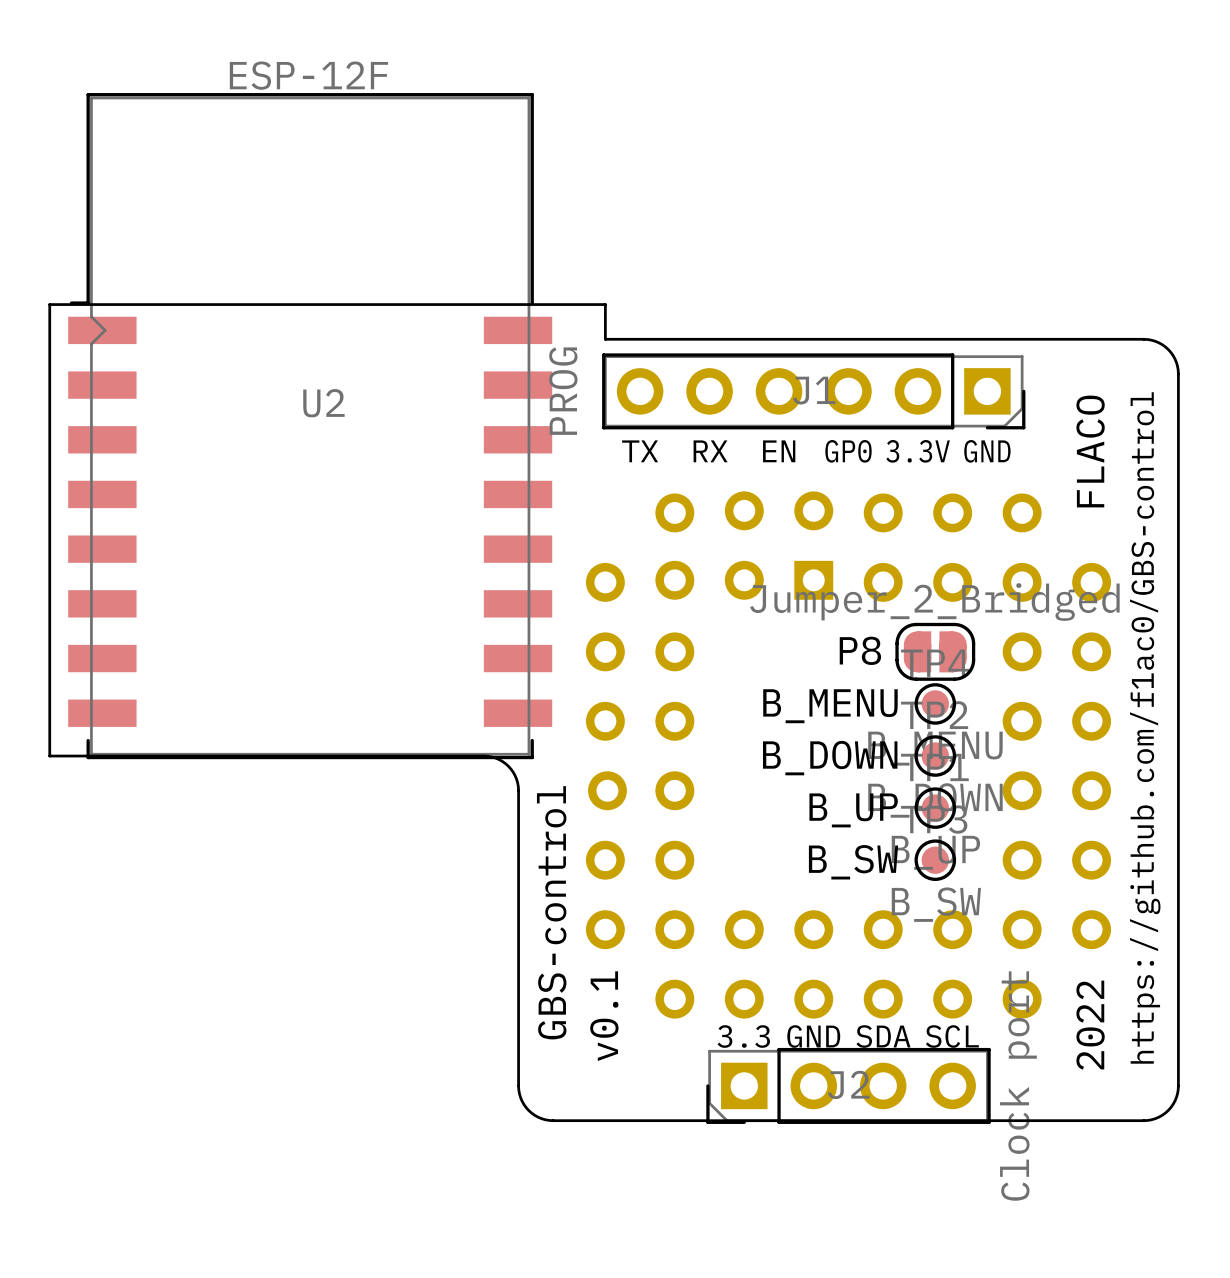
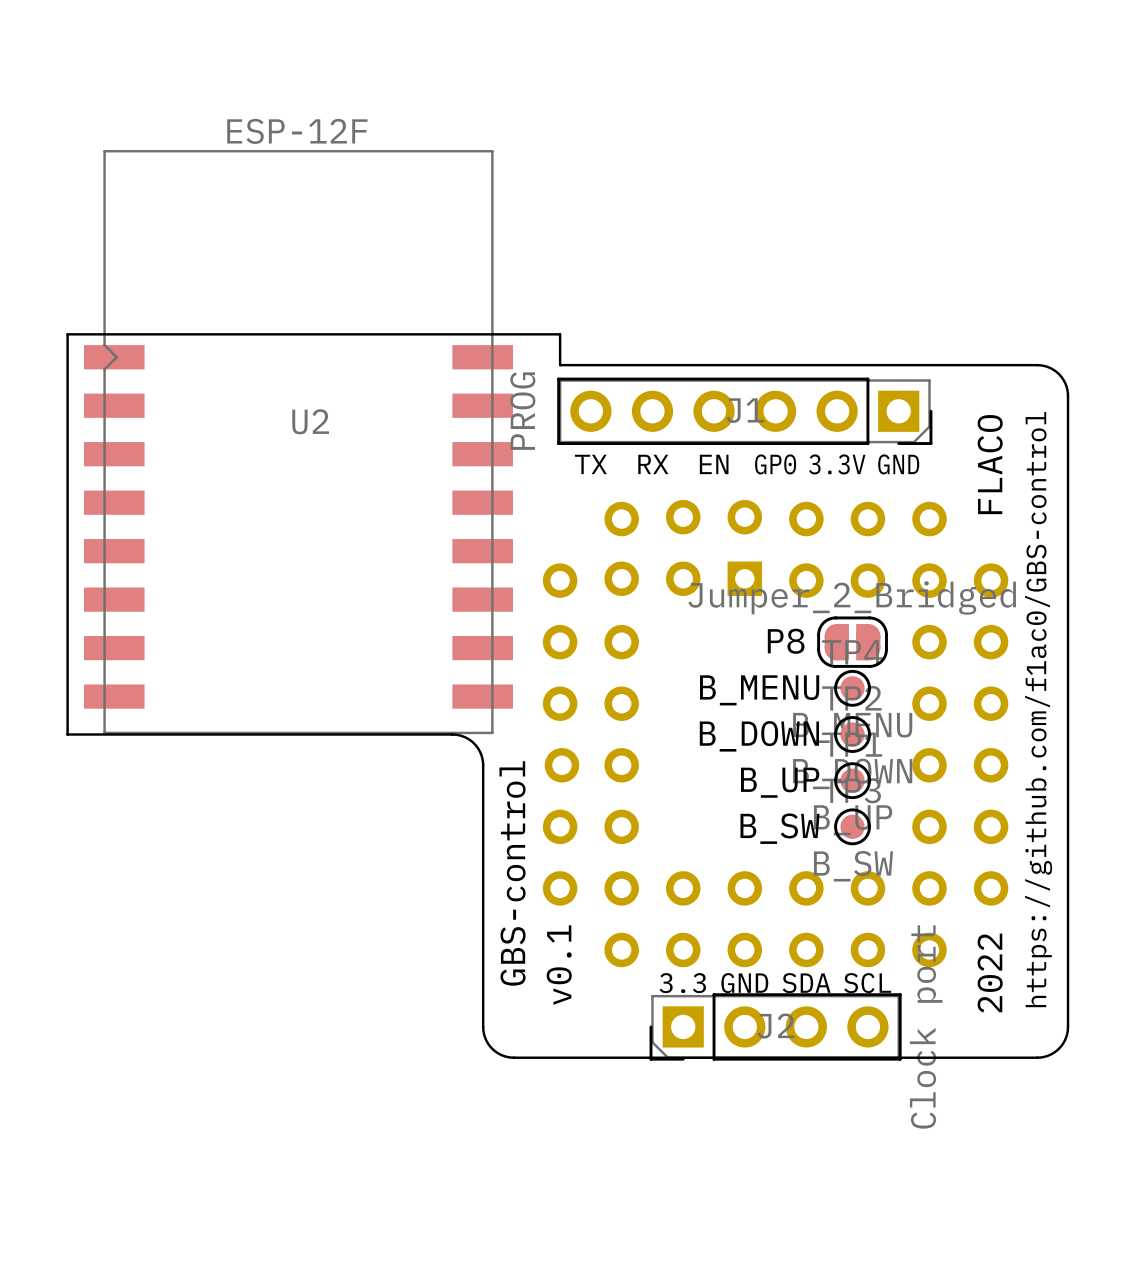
U2 footprint: [68, 93, 553, 760] -> [83, 150, 513, 735]

